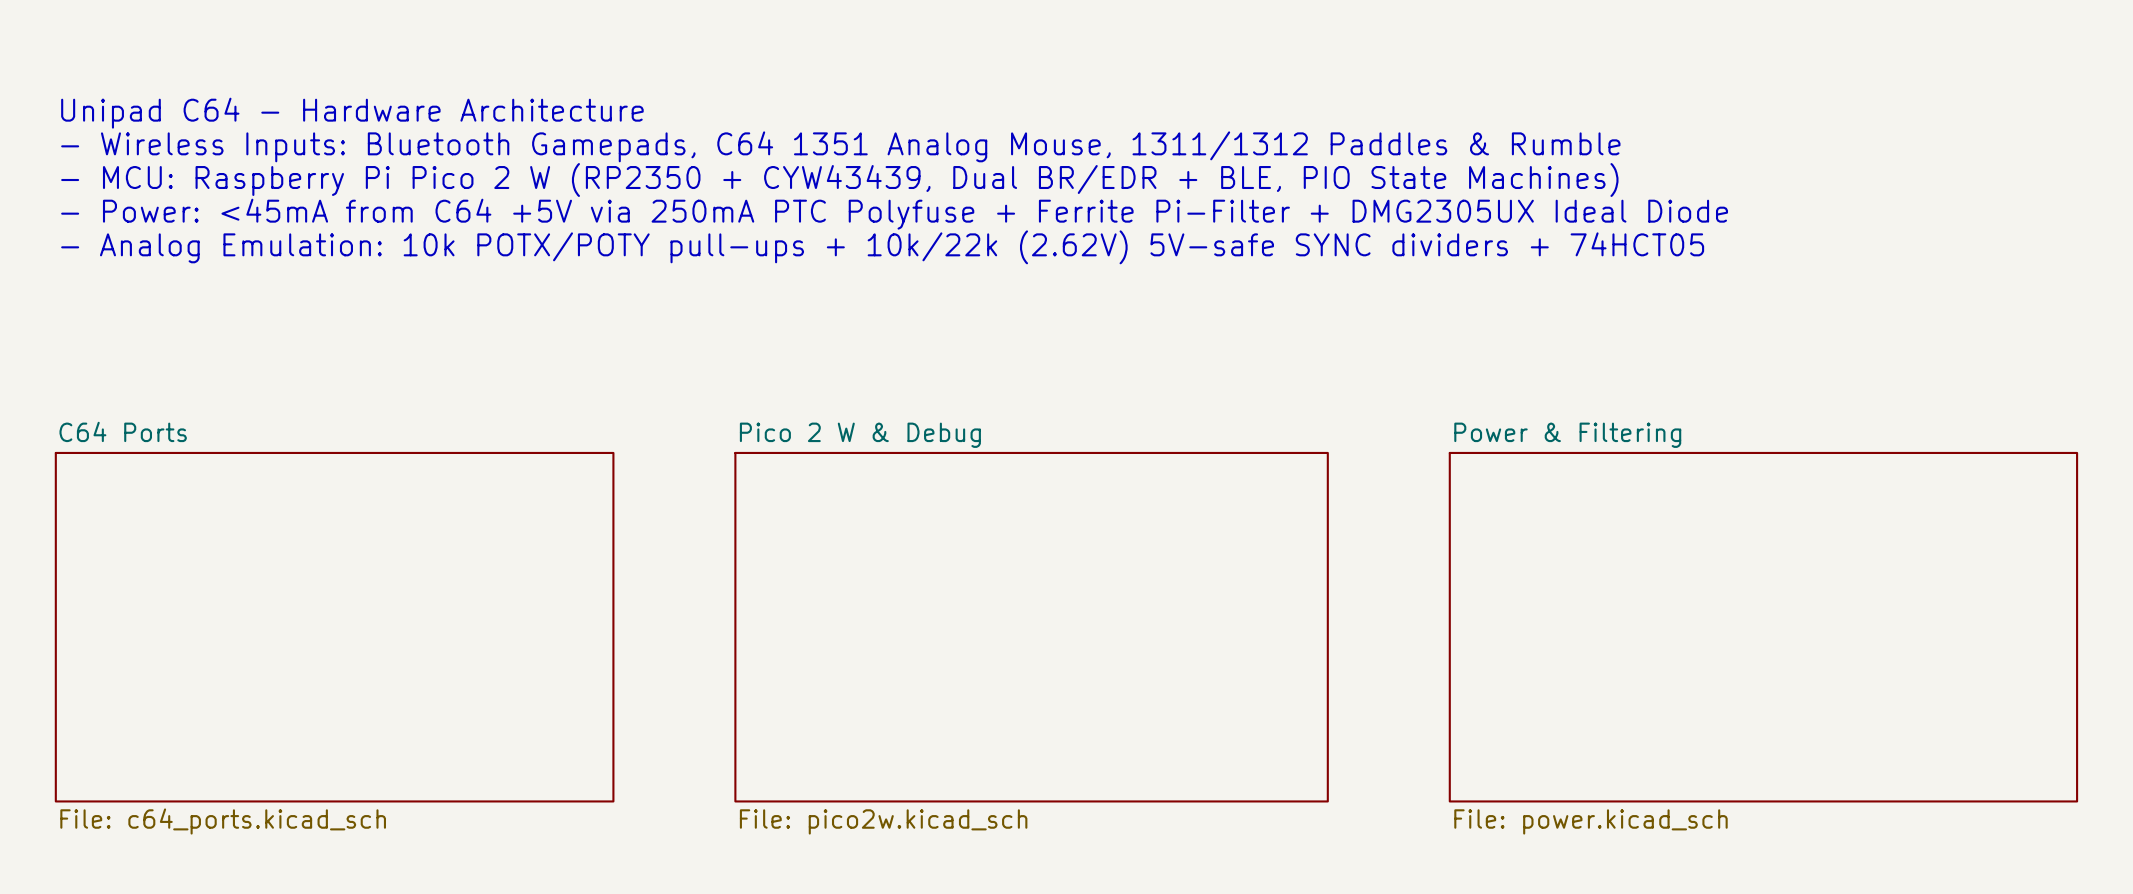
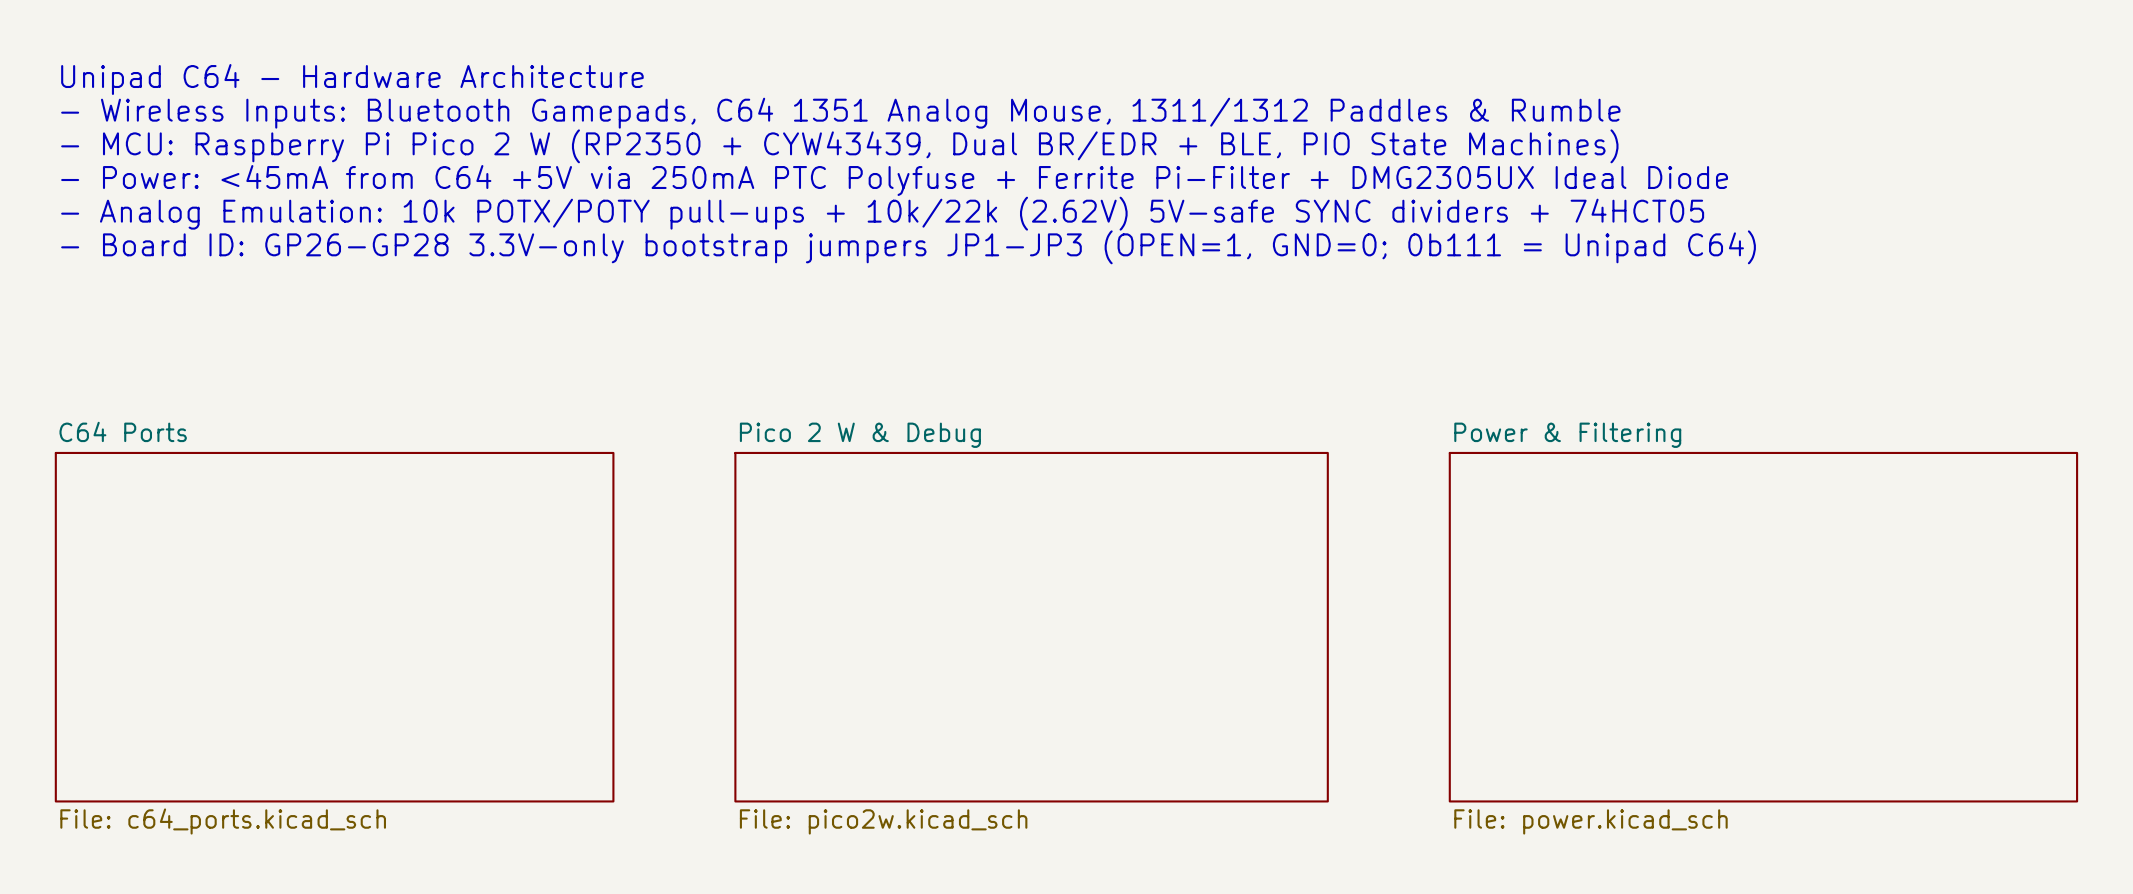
text: none -> Unipad C64 - Hardware Architecture (352, 79)
text: Unipad C64 - Hardware Architecture (352, 113) -> - Wireless Inputs: Bluetooth Gamepads, C64 1351 Analog Mouse, 1311/1312 Paddles & Rumble (840, 113)
text: - Wireless Inputs: Bluetooth Gamepads, C64 1351 Analog Mouse, 1311/1312 Paddles & Rumble (840, 146) -> - MCU: Raspberry Pi Pico 2 W (RP2350 + CYW43439, Dual BR/EDR + BLE, PIO State Machines) (839, 146)
text: - MCU: Raspberry Pi Pico 2 W (RP2350 + CYW43439, Dual BR/EDR + BLE, PIO State Machines) (839, 180) -> - Power: <45mA from C64 +5V via 250mA PTC Polyfuse + Ferrite Pi-Filter + DMG2305UX Ideal Diode (894, 180)
text: - Power: <45mA from C64 +5V via 250mA PTC Polyfuse + Ferrite Pi-Filter + DMG2305UX Ideal Diode (894, 214) -> - Analog Emulation: 10k POTX/POTY pull-ups + 10k/22k (2.62V) 5V-safe SYNC dividers + 74HCT05 (882, 213)
text: - Analog Emulation: 10k POTX/POTY pull-ups + 10k/22k (2.62V) 5V-safe SYNC dividers + 74HCT05 (882, 247) -> - Board ID: GP26-GP28 3.3V-only bootstrap jumpers JP1-JP3 (OPEN=1, GND=0; 0b111 = Unipad C64) (908, 247)

